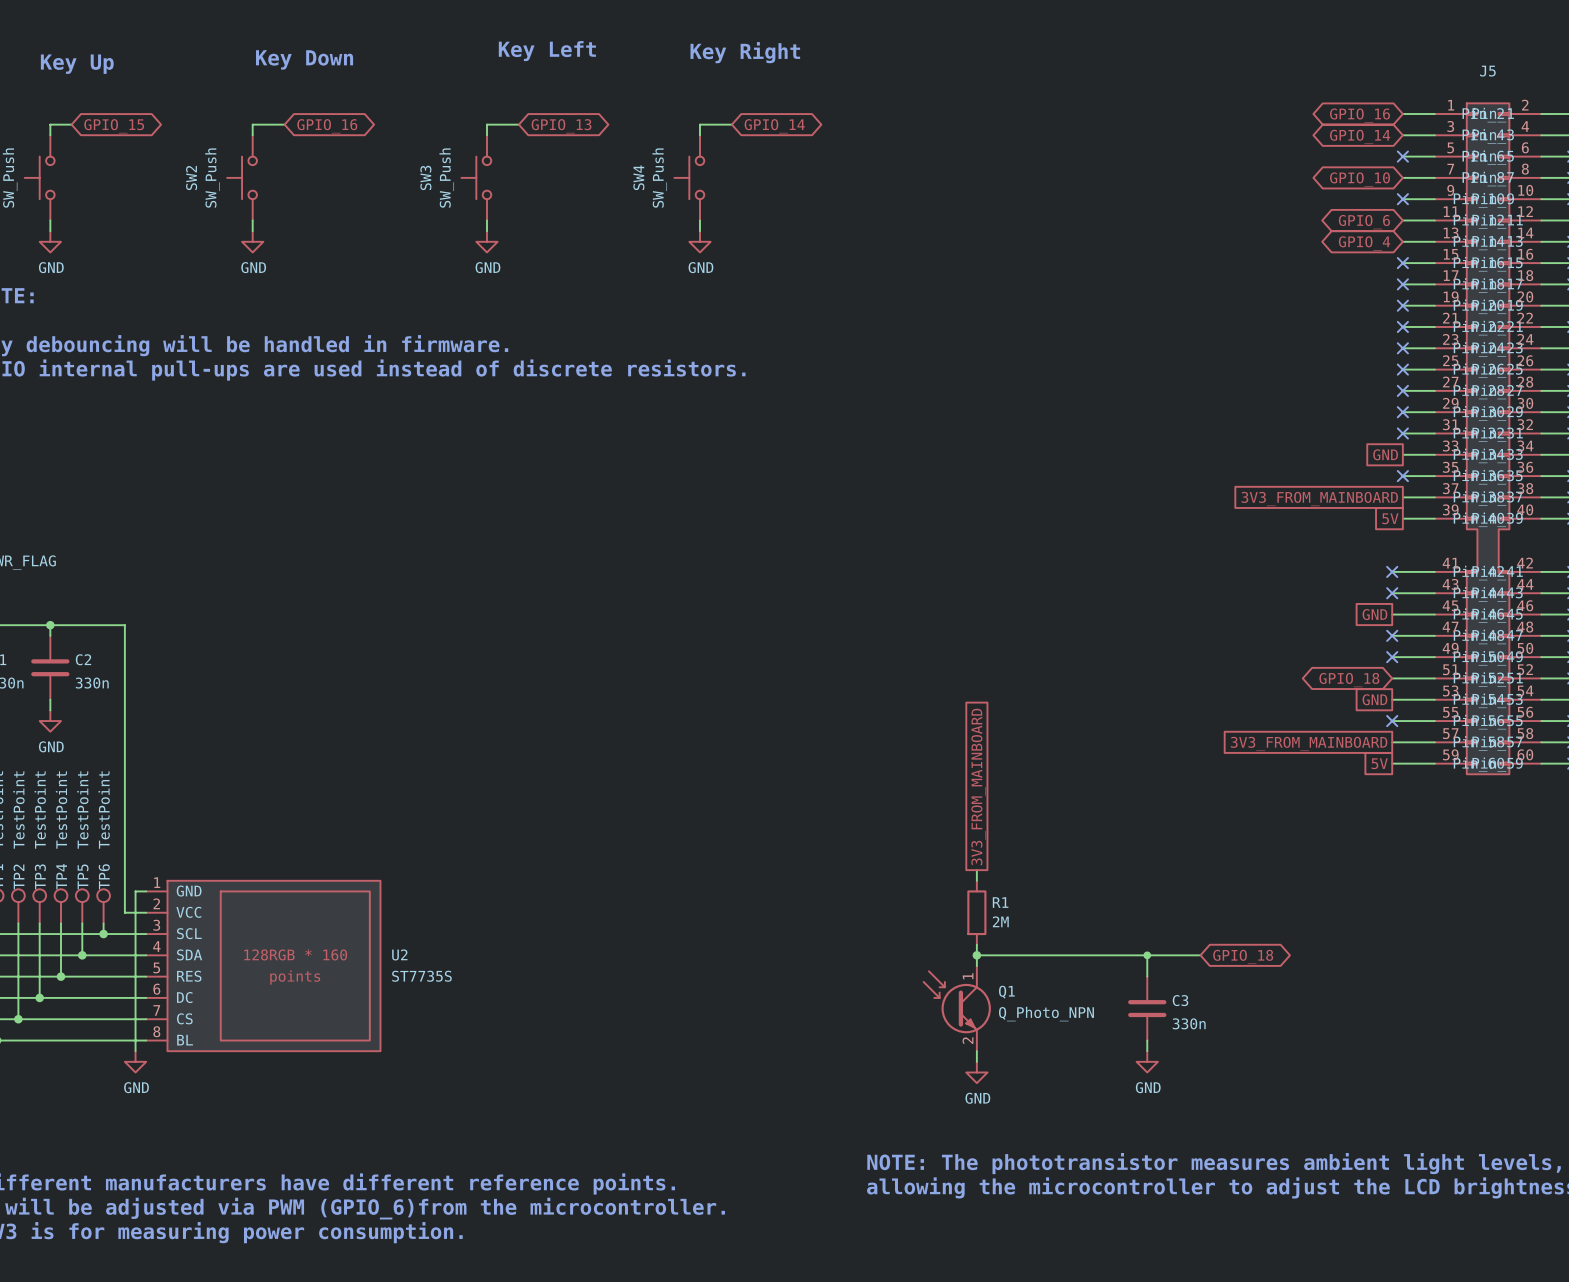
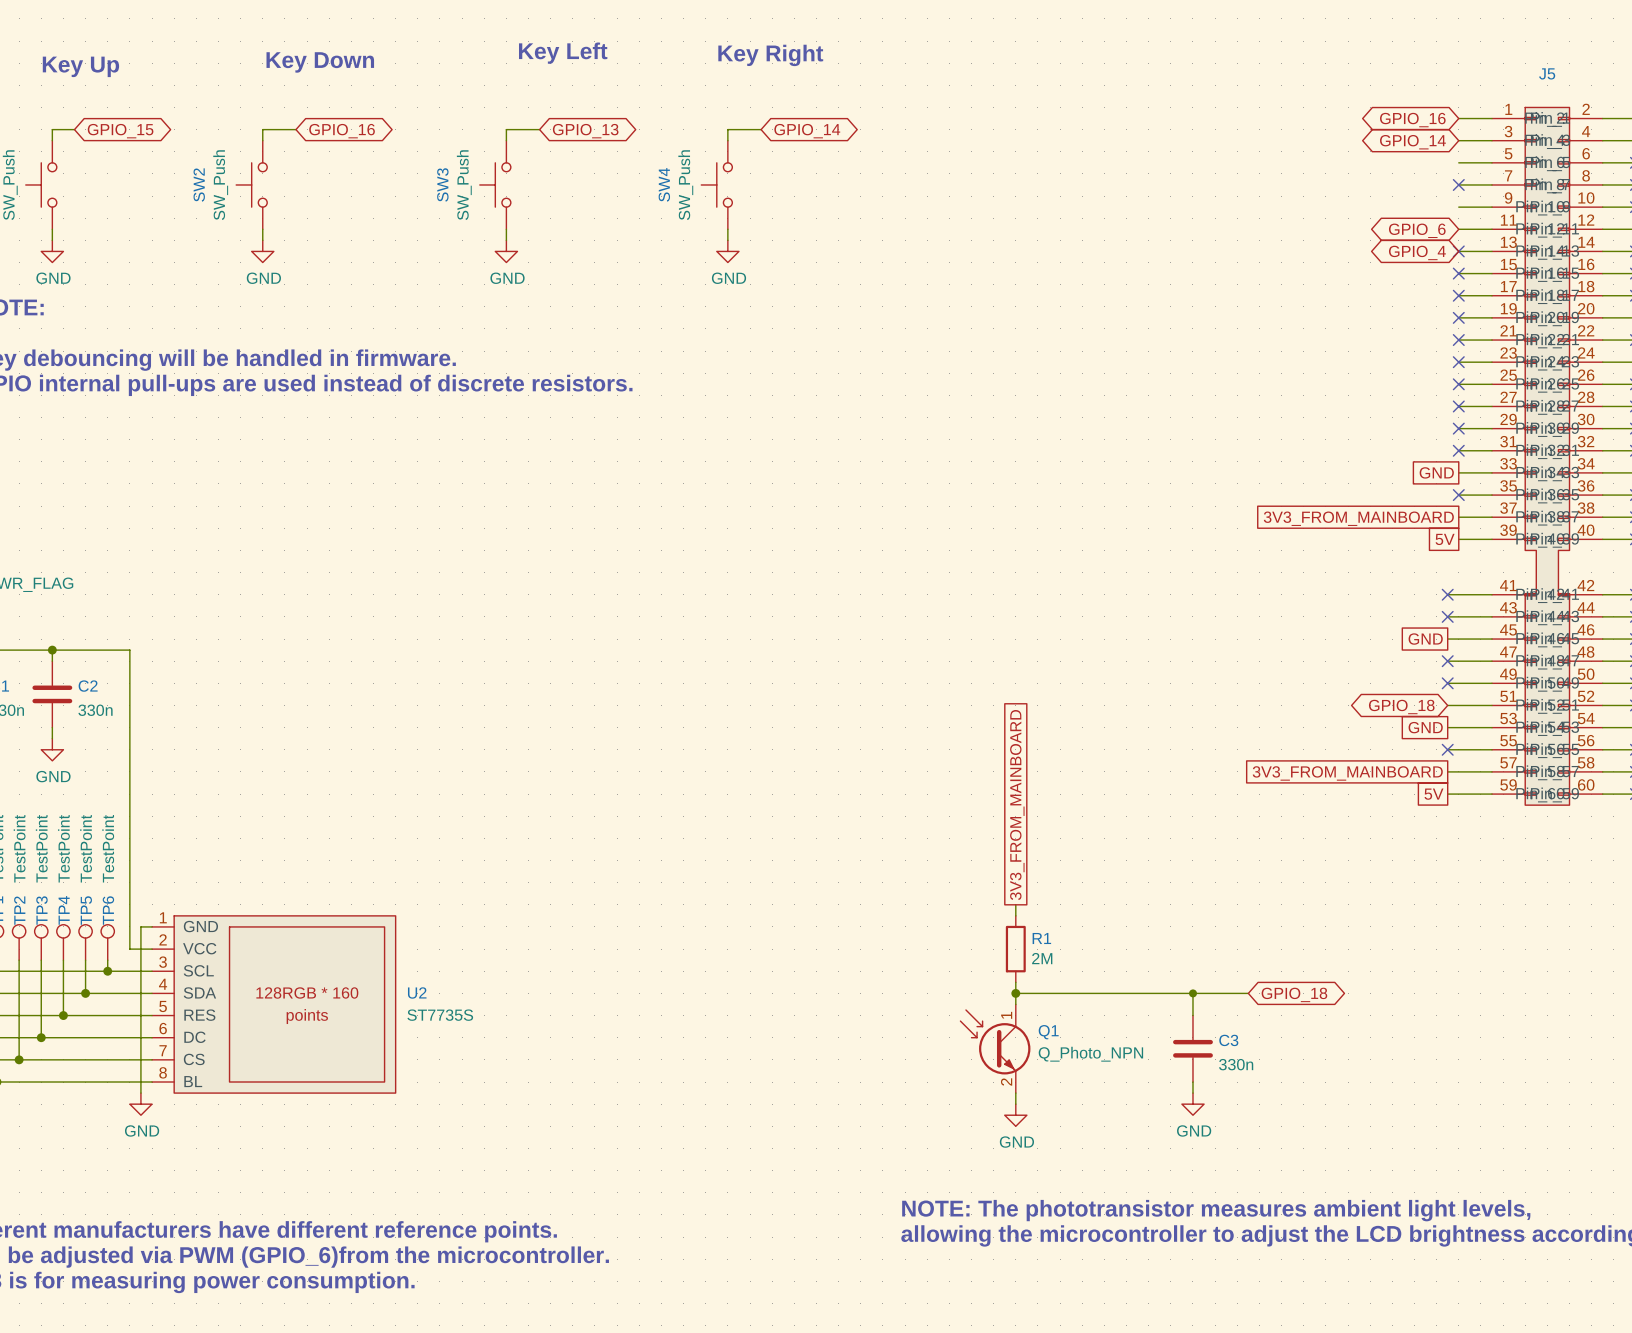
no-connect mark: (1402, 156) -> none
no-connect mark: none -> (1458, 184)
global label: GPIO_10 (1360, 179) -> none
no-connect mark: (1402, 199) -> none
no-connect mark: none -> (1458, 251)

